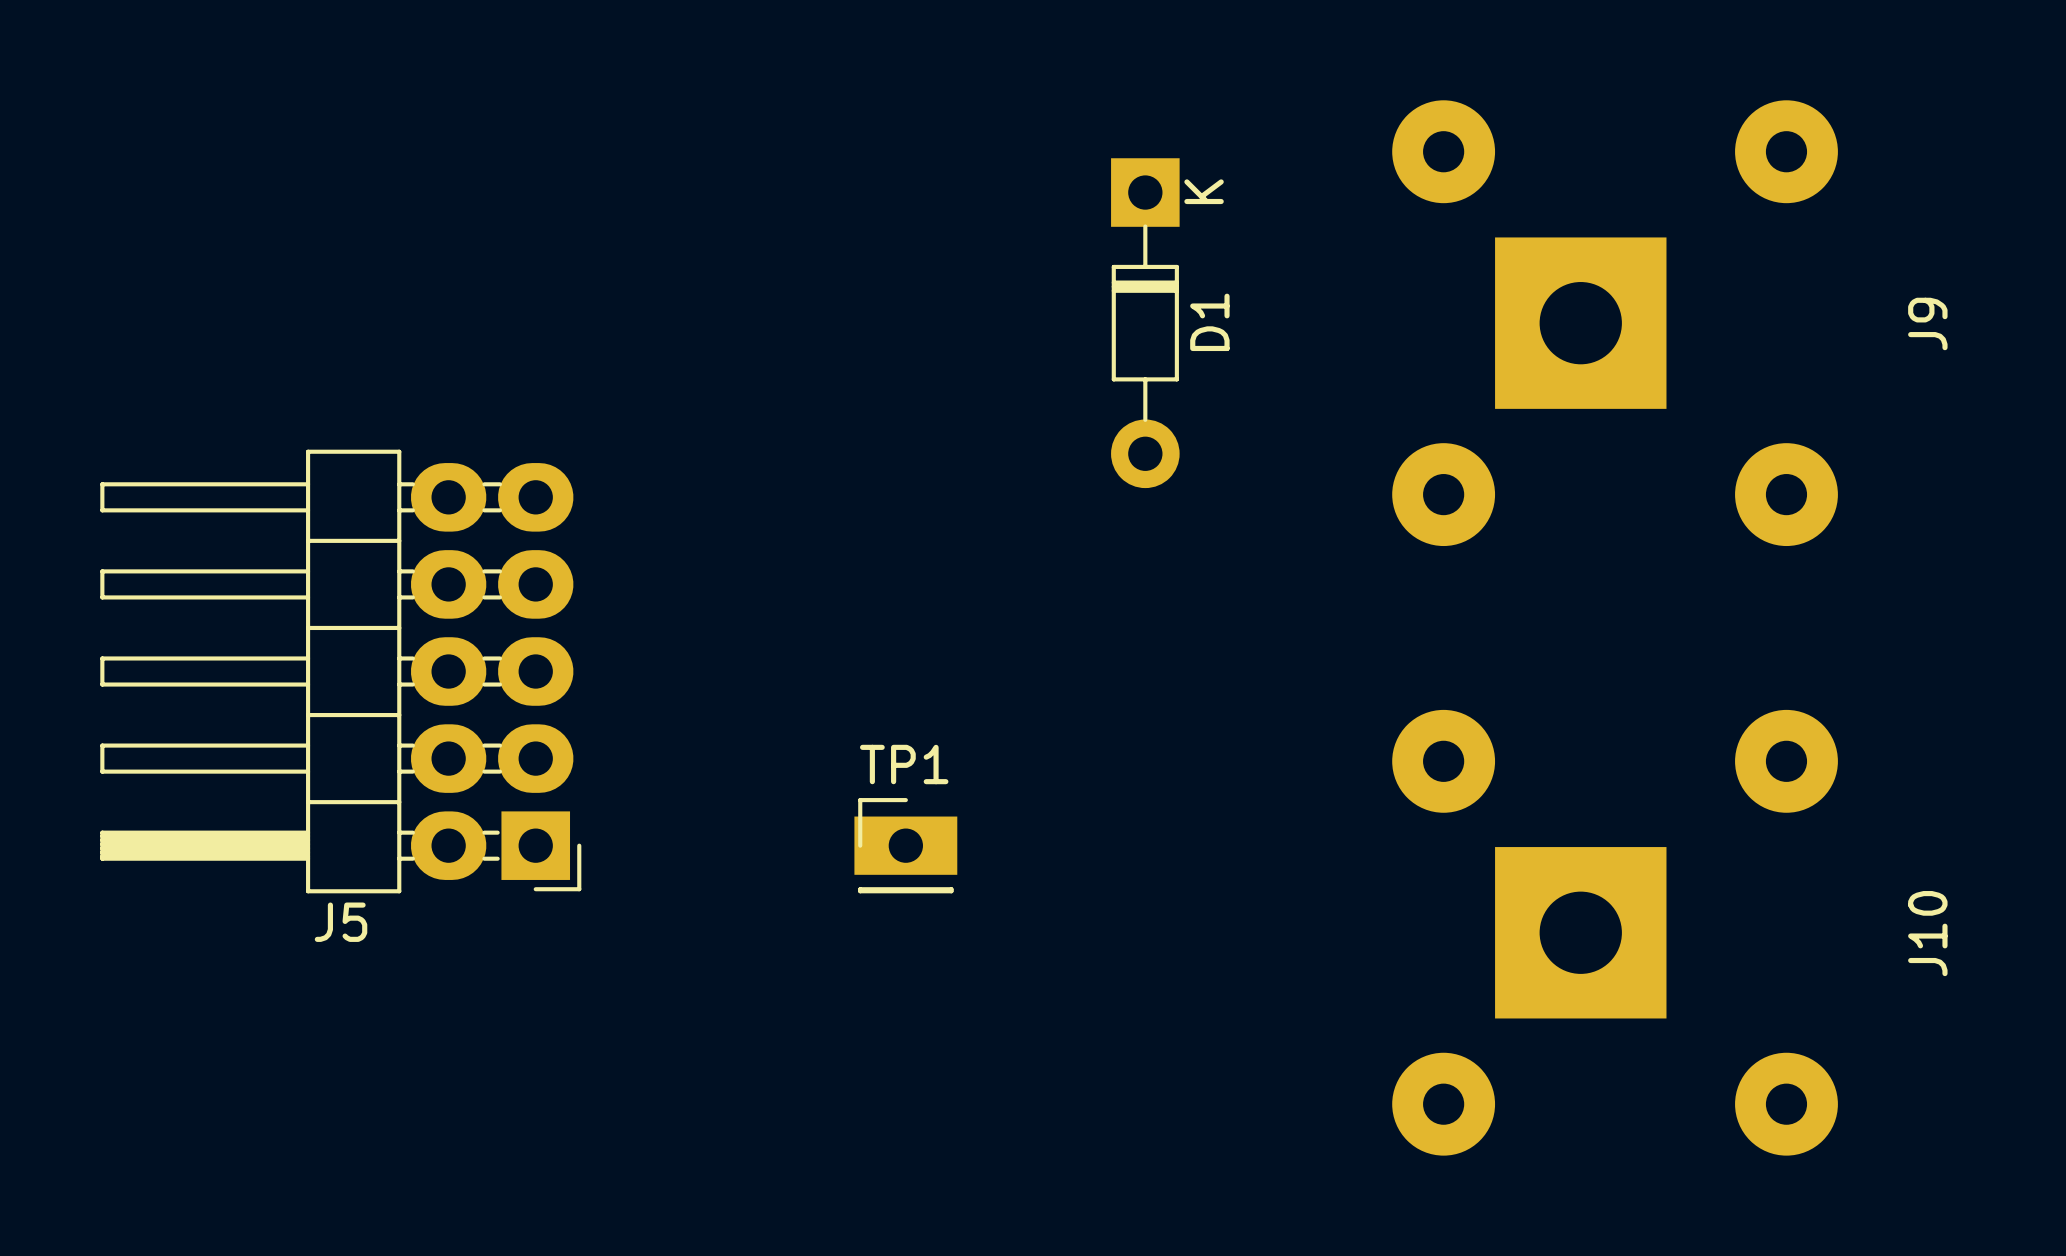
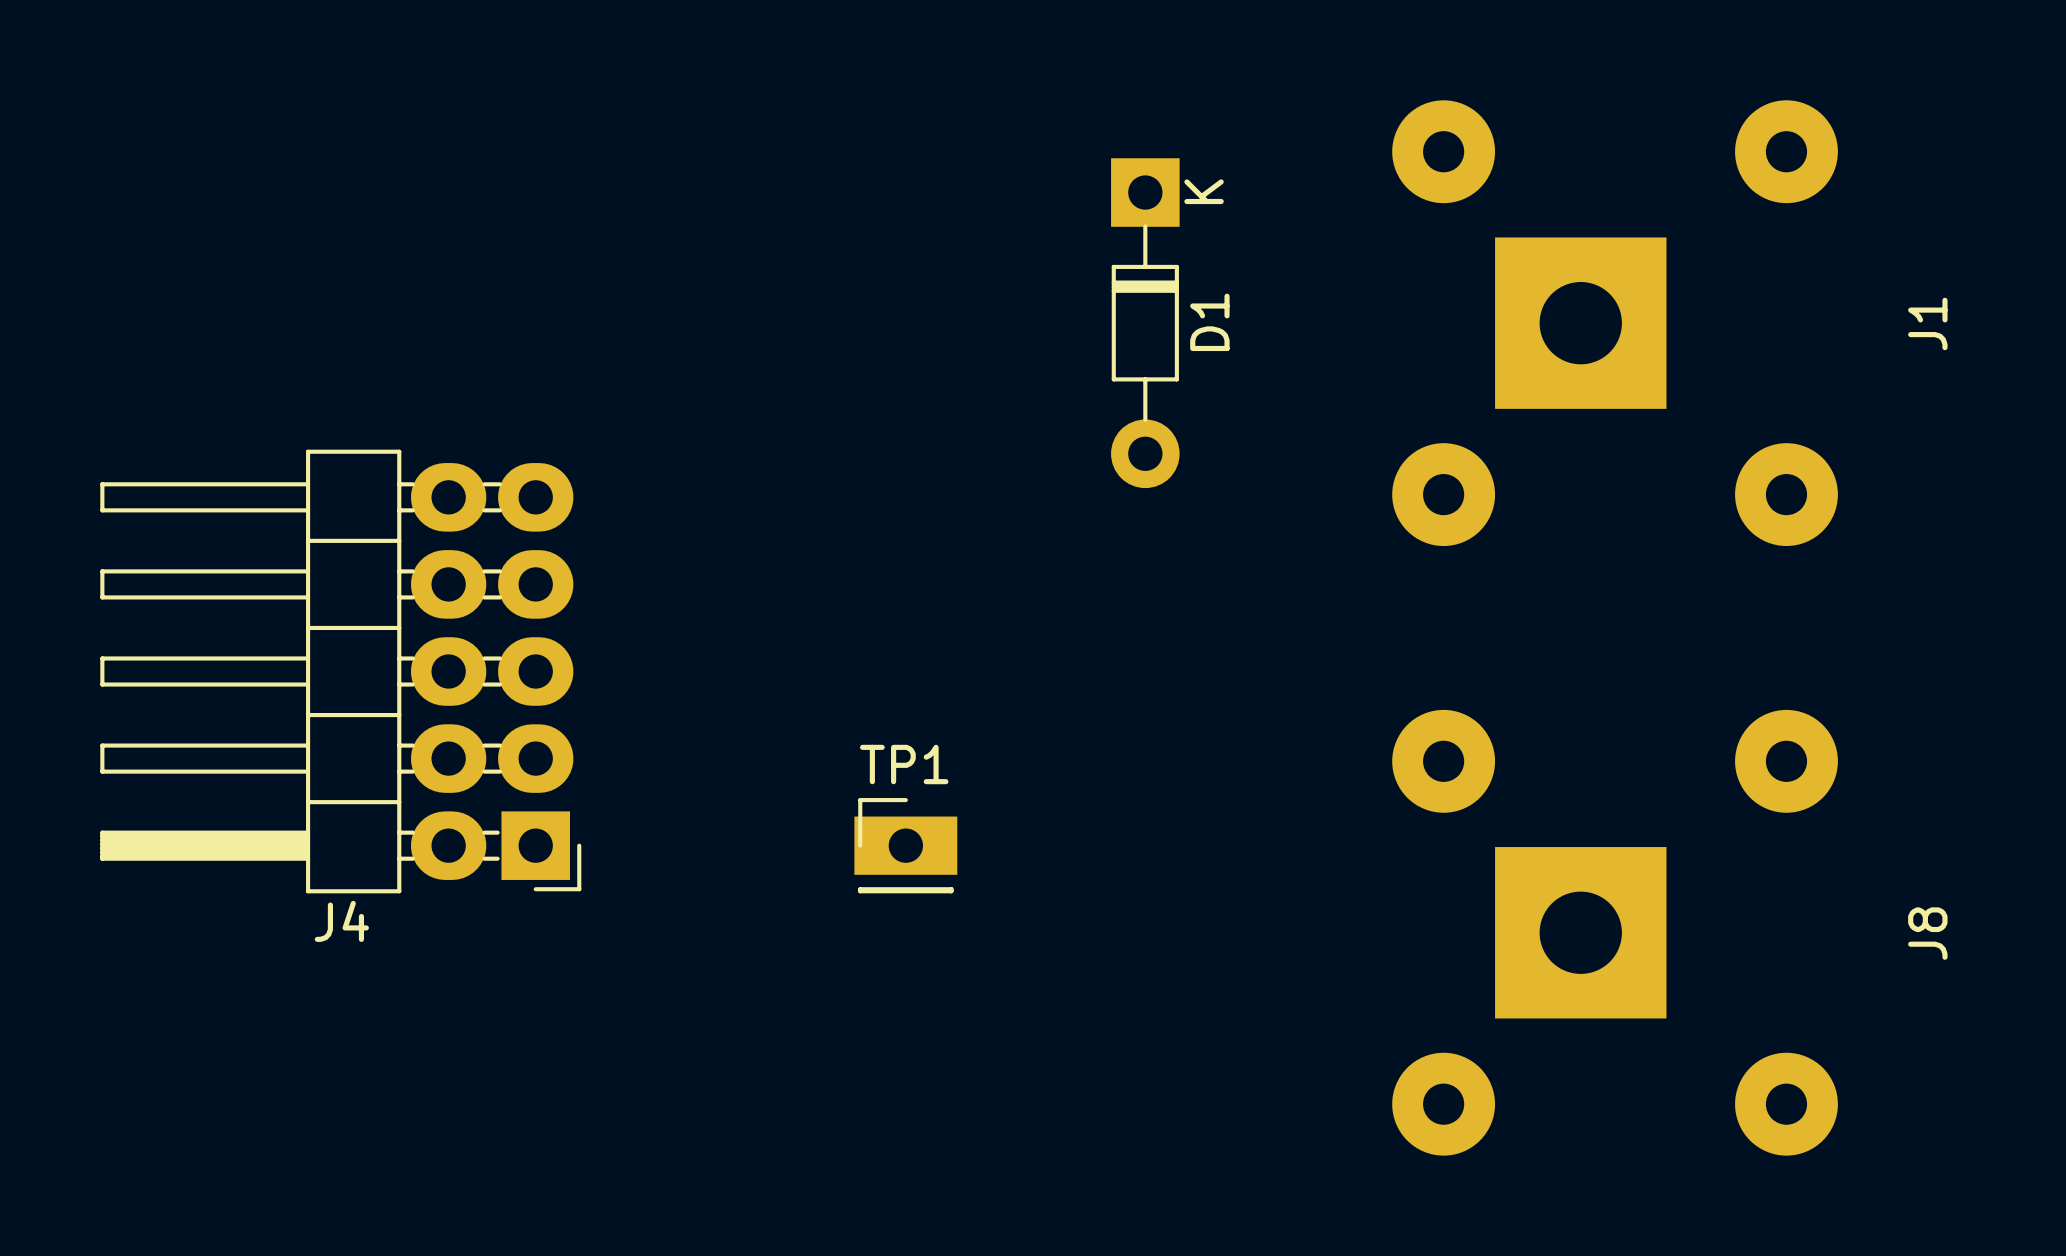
J9 name: J9 (1927, 323) -> J1 (1927, 323)
J5 name: J5 (341, 922) -> J4 (341, 921)
J10 name: J10 (1927, 933) -> J8 (1927, 933)

